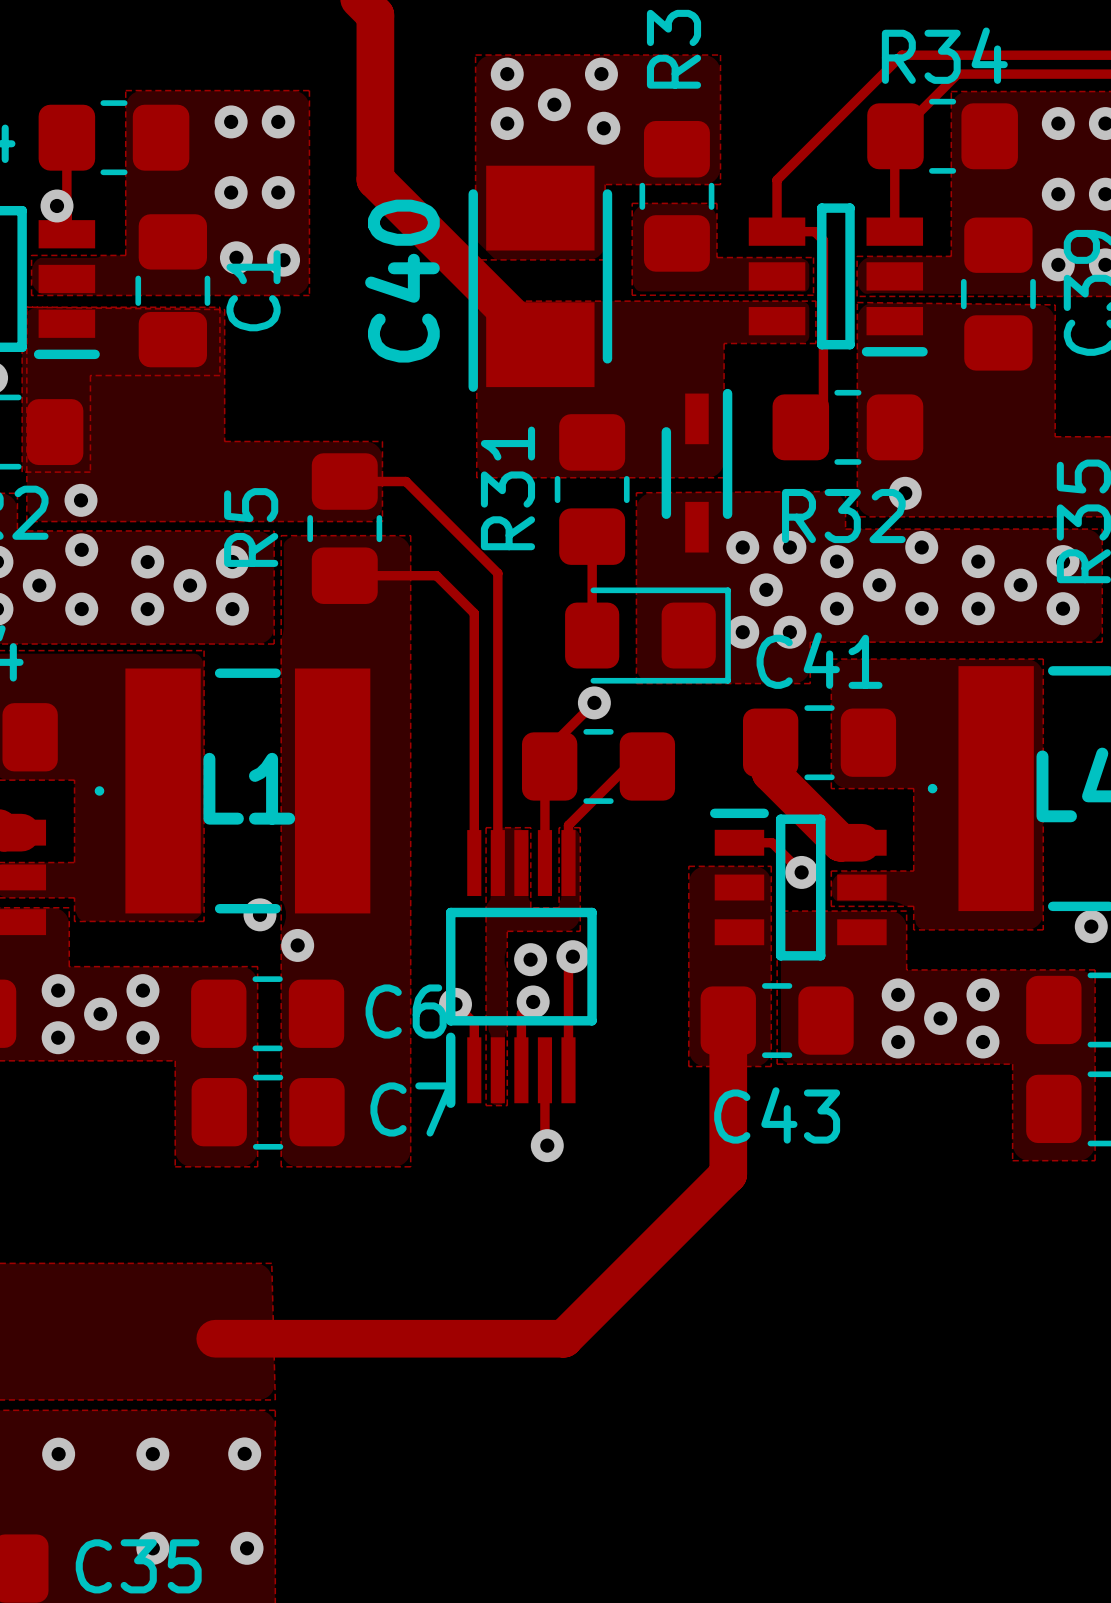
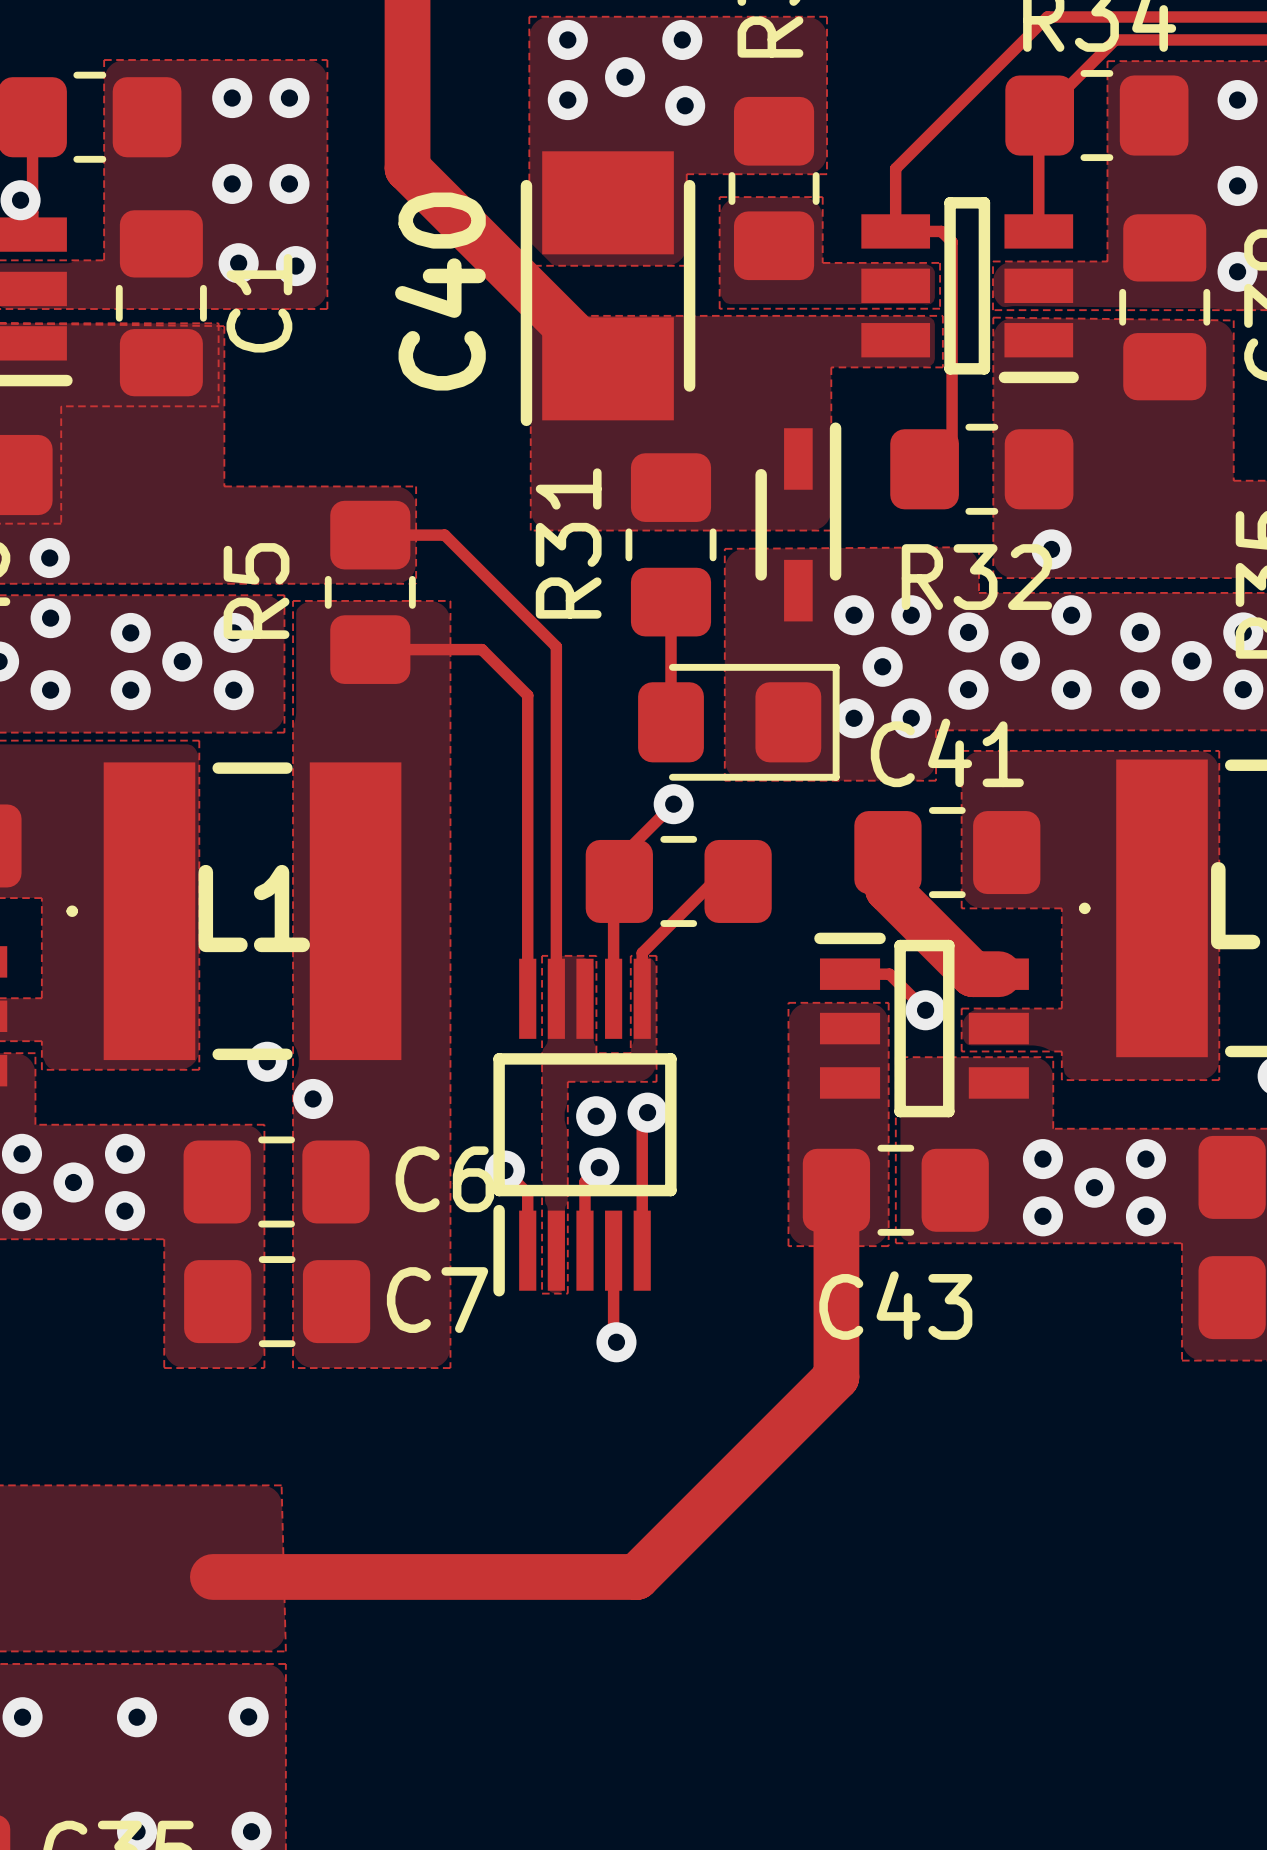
C7 name position: C7 (412, 1109) -> C7 (437, 1300)

